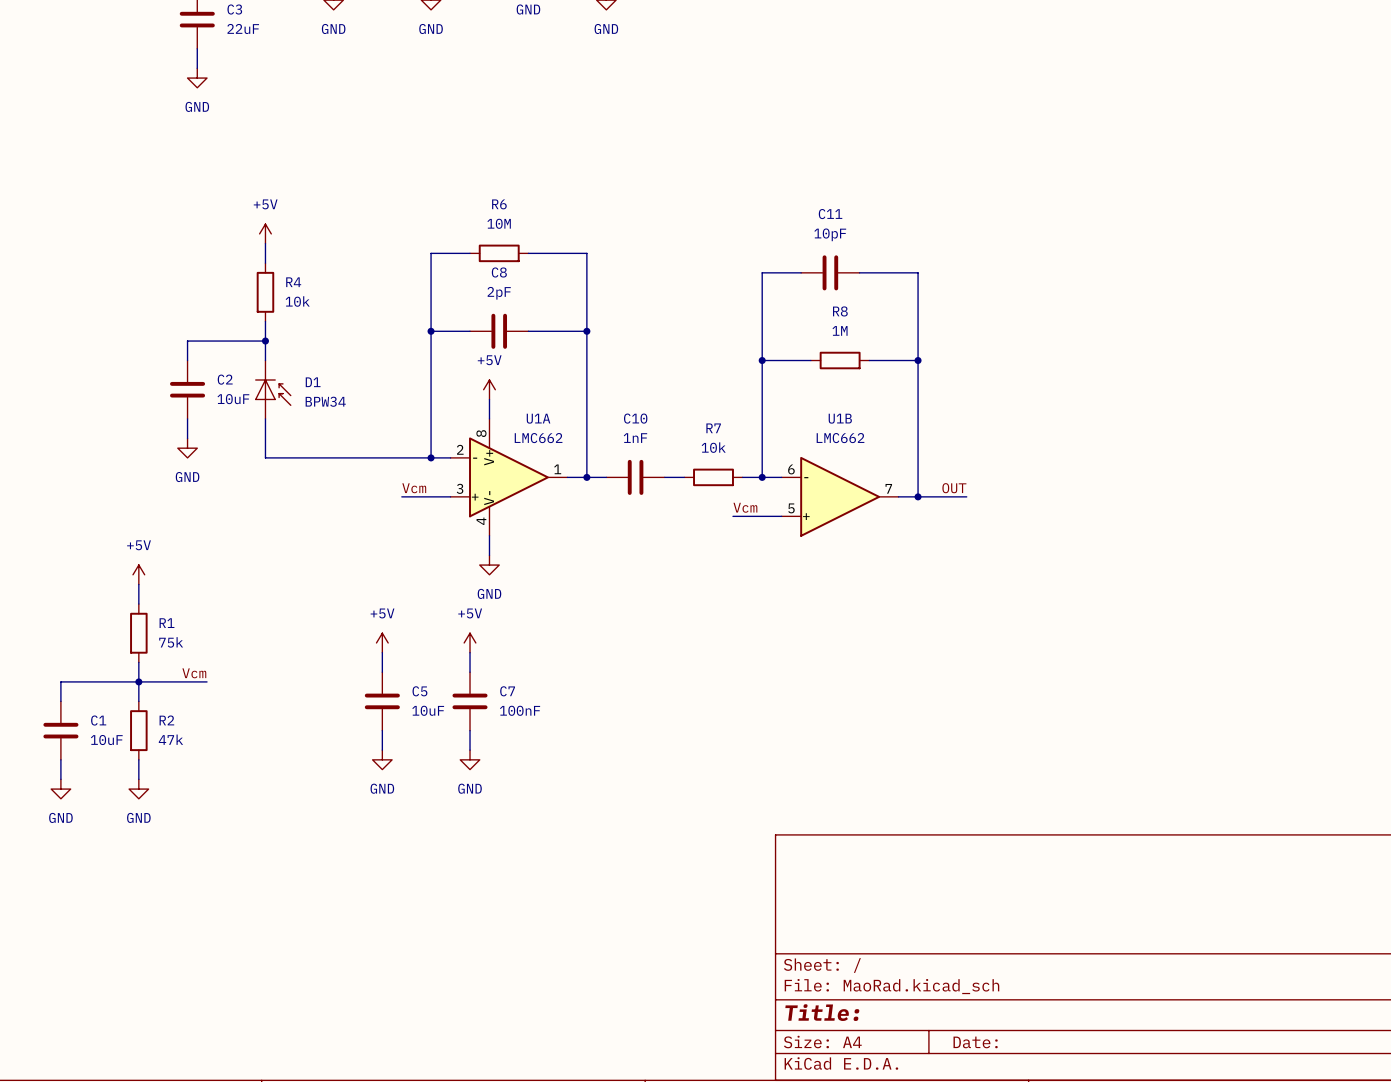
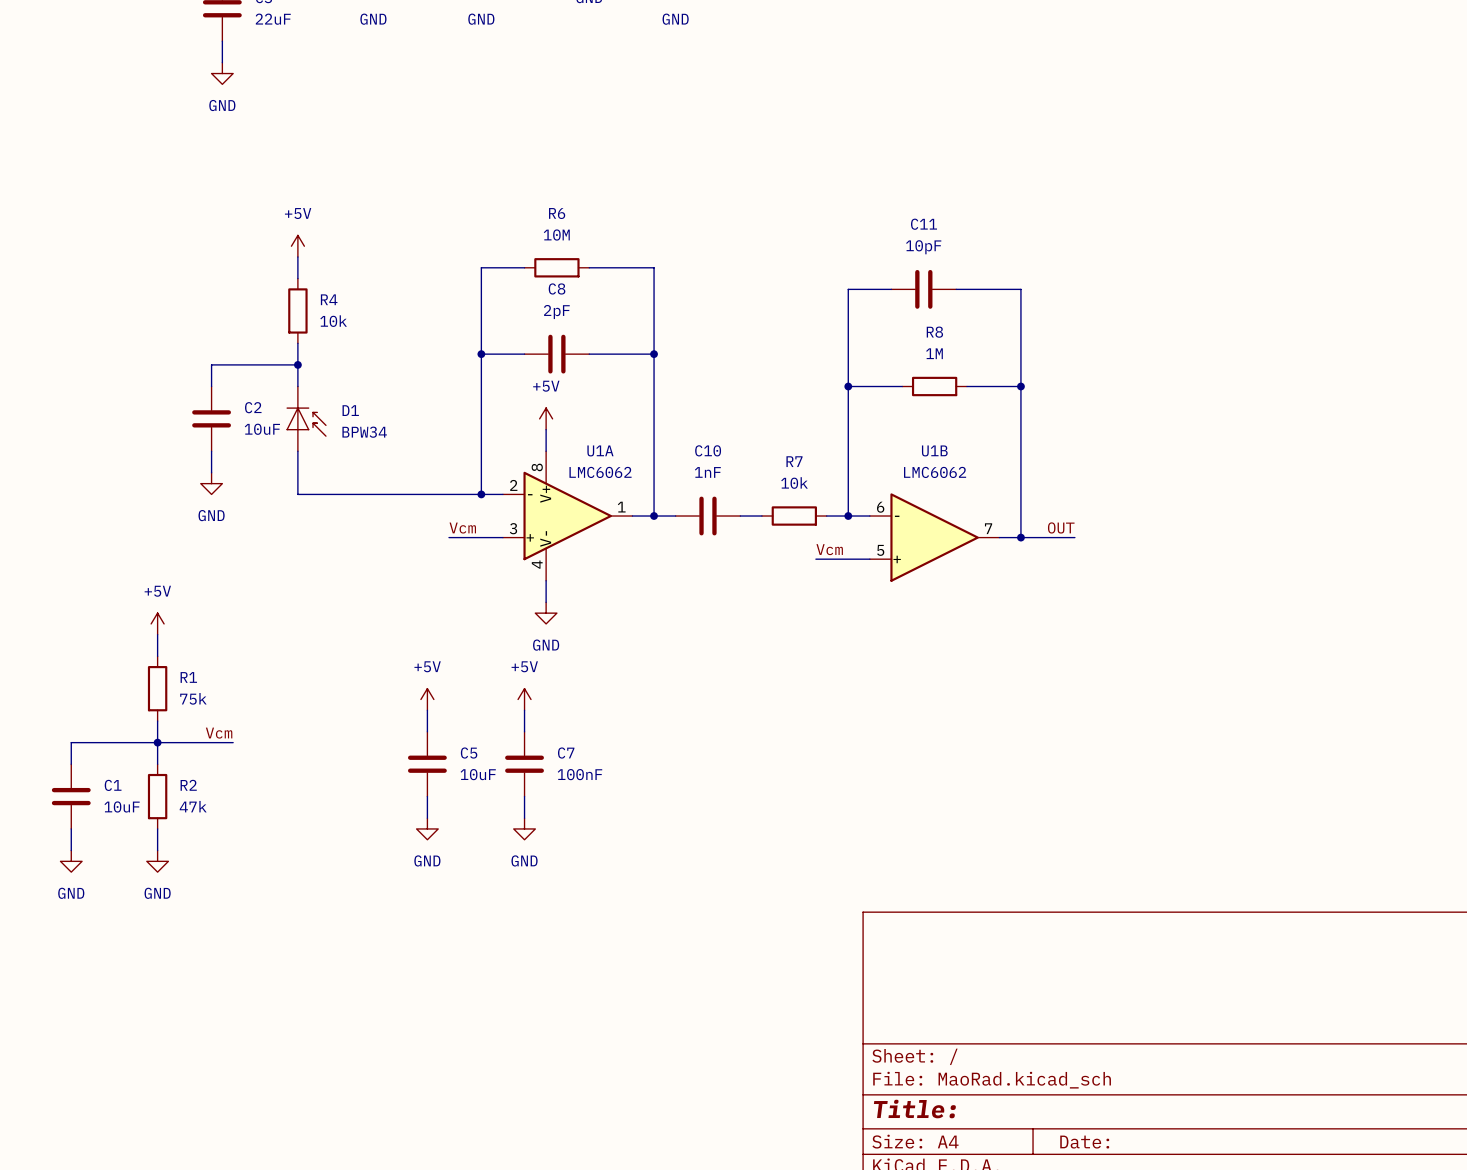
U1A value: LMC662 (538, 438) -> LMC6062 (600, 472)
U1B value: LMC662 (840, 438) -> LMC6062 (935, 472)

